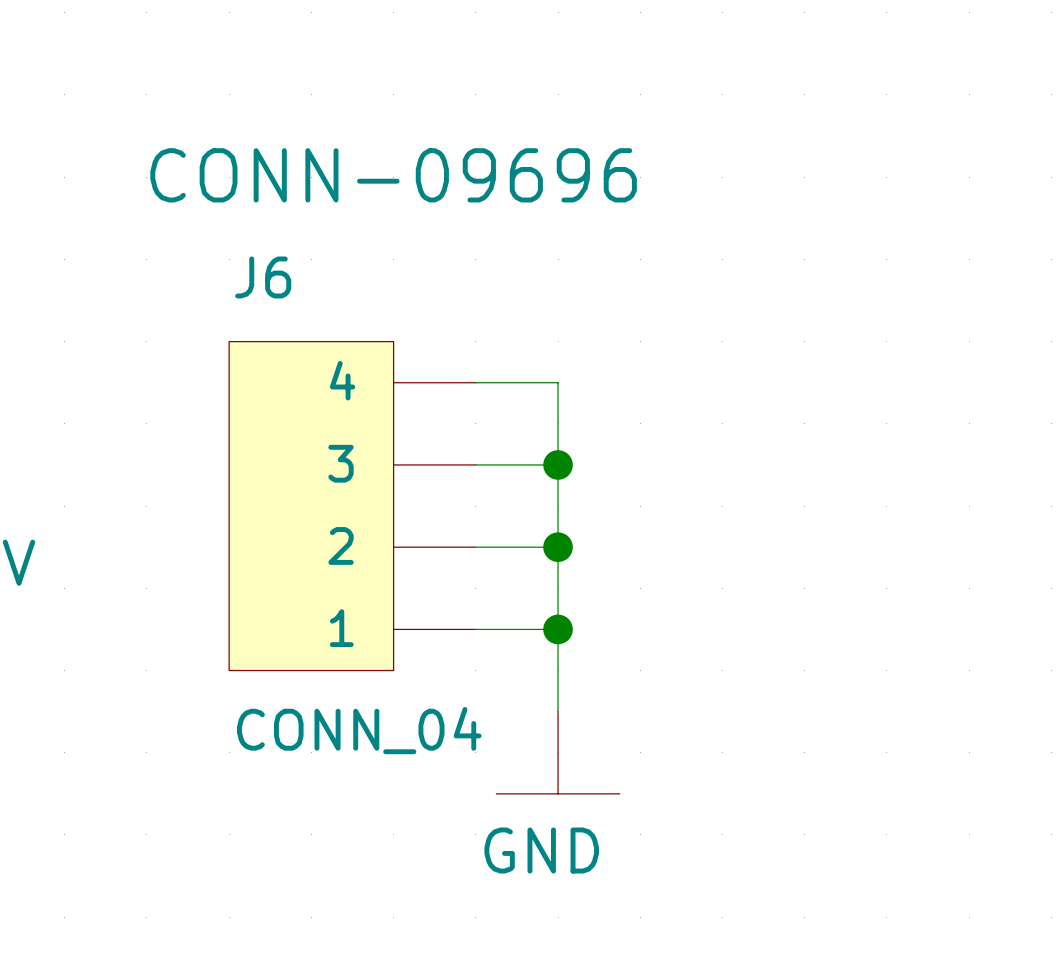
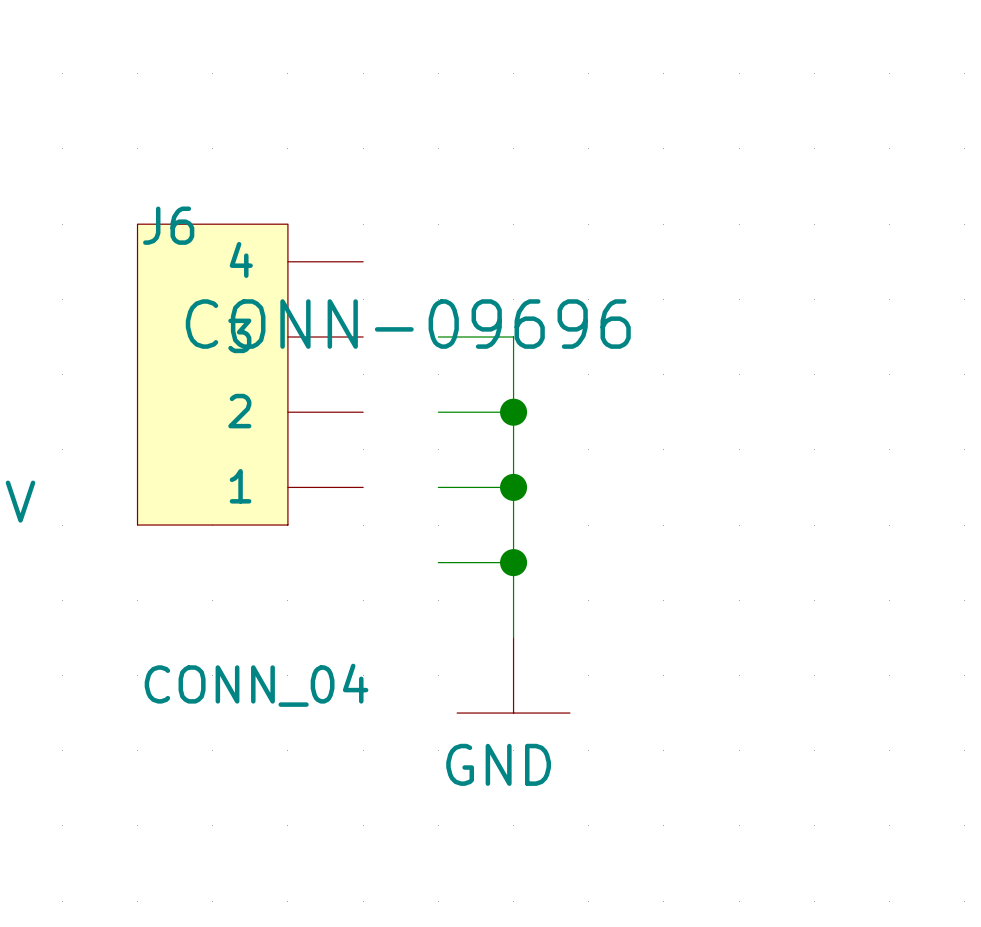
J6 text: CONN-09696 (393, 175) -> none
J6 name position: J6 (263, 277) -> J6 (168, 225)
J6 text: none -> CONN-09696 (408, 324)
J6 position: (352, 506) -> (250, 374)
J6 value position: CONN_04 (359, 730) -> CONN_04 (256, 685)

